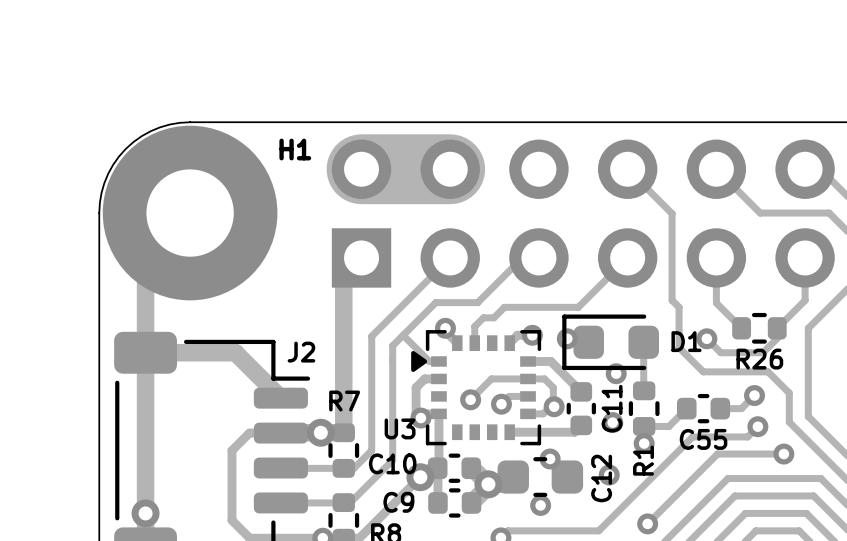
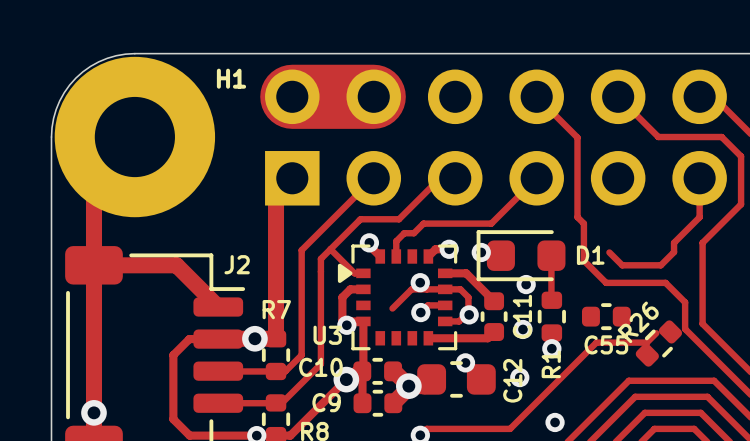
track: (716, 257) (716, 303) (741, 328) -> none
R26 rotation: 0° (759, 328) -> 45° counterclockwise (658, 343)
R26 position: (759, 328) -> (658, 343)
via: (706, 338) -> none
track: (754, 395) (741, 408) (720, 408) -> none
via: (754, 395) -> none
via position: (470, 399) -> (420, 282)
track: (686, 408) (668, 426) (644, 426) -> none
via: (757, 426) -> none
track: (783, 454) (717, 454) (647, 523) -> none
via: (783, 454) -> none
via: (540, 505) -> none

